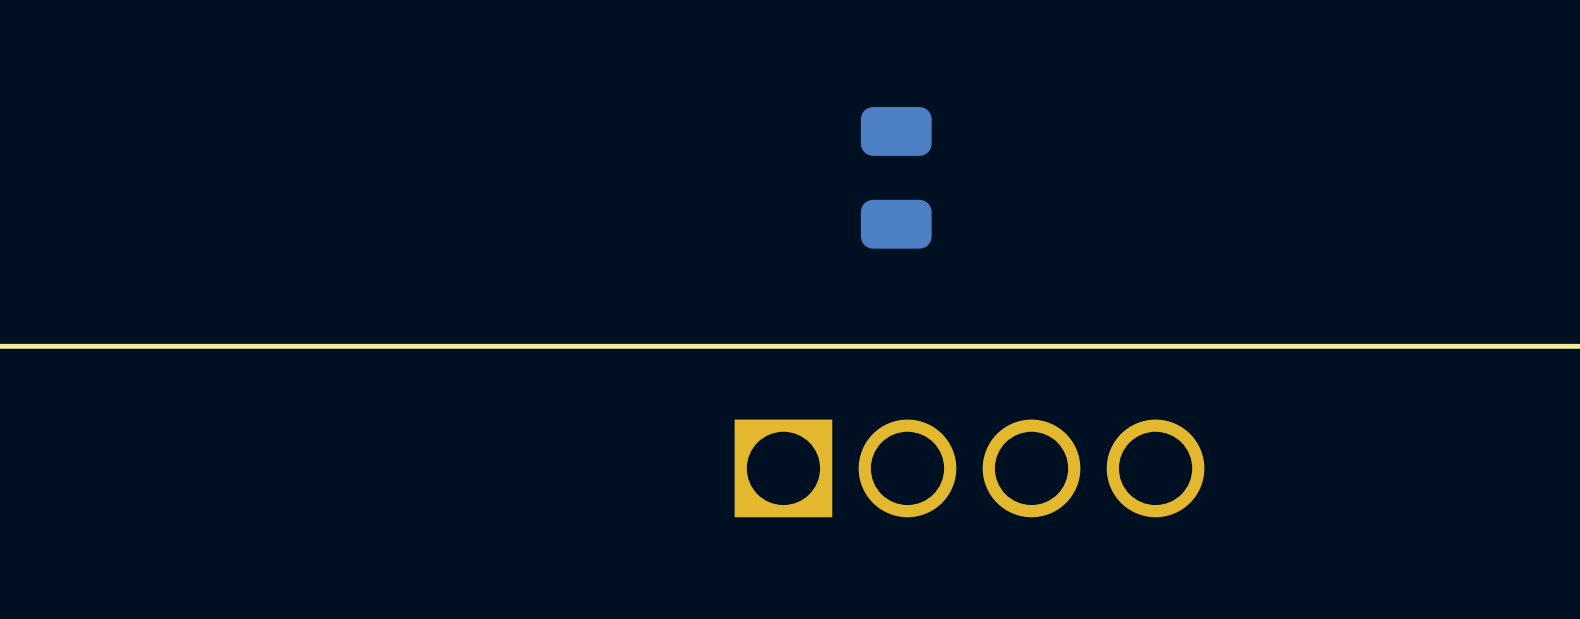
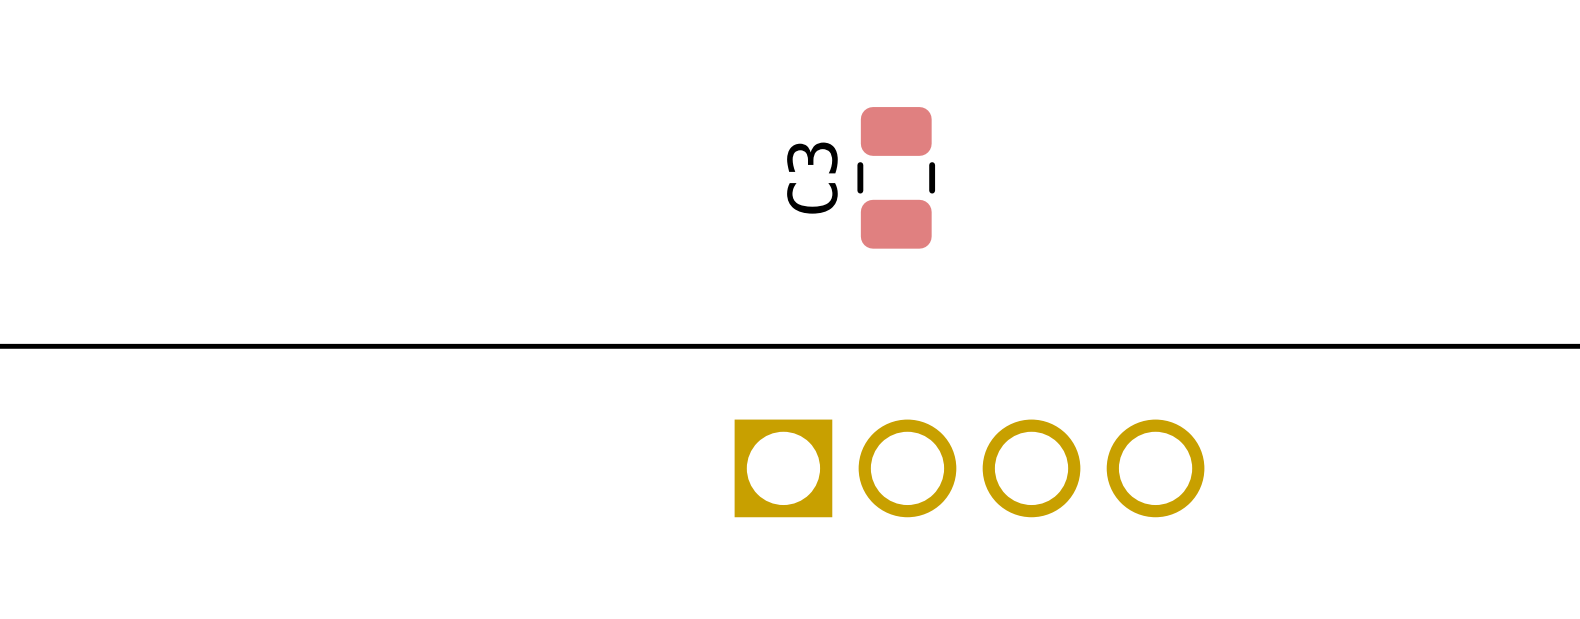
C3 side: bottom (896, 177) -> top (896, 177)

